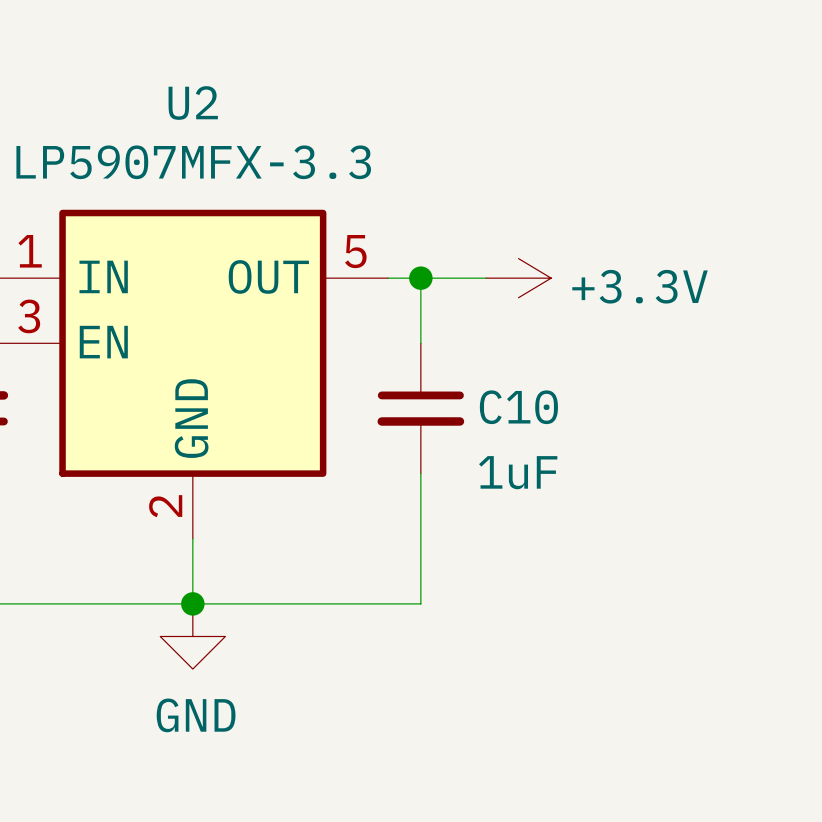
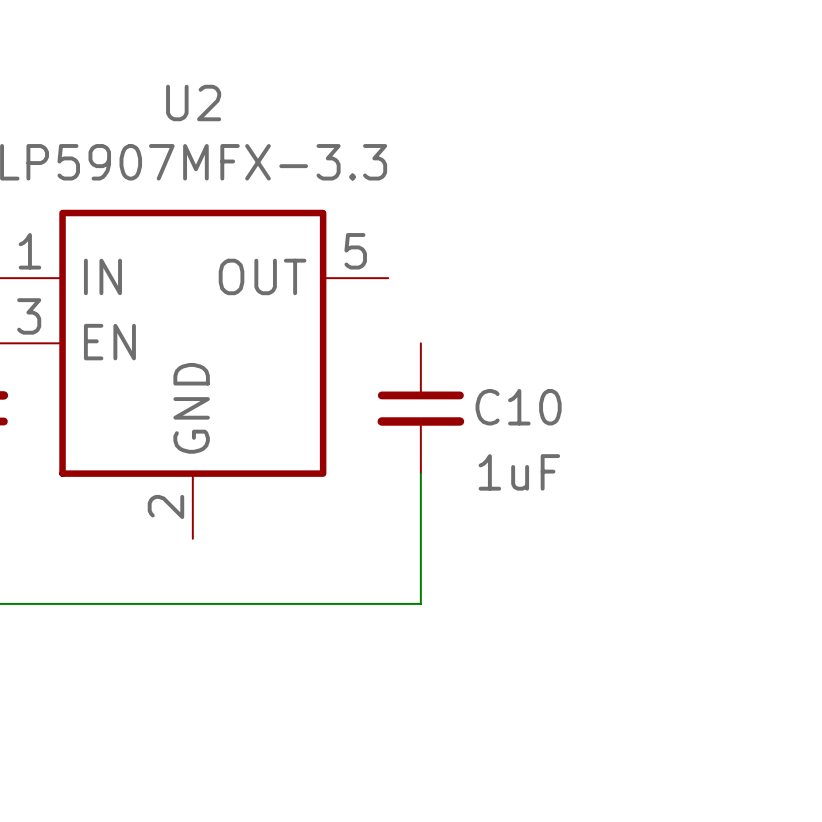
wire: (388, 278) (486, 278) -> none
wire: (420, 278) (420, 343) -> none
junction: (420, 278) -> none
power symbol: +3.3V (518, 278) -> none
wire: (192, 538) (192, 603) -> none
junction: (192, 603) -> none
power symbol: GND (192, 636) -> none

